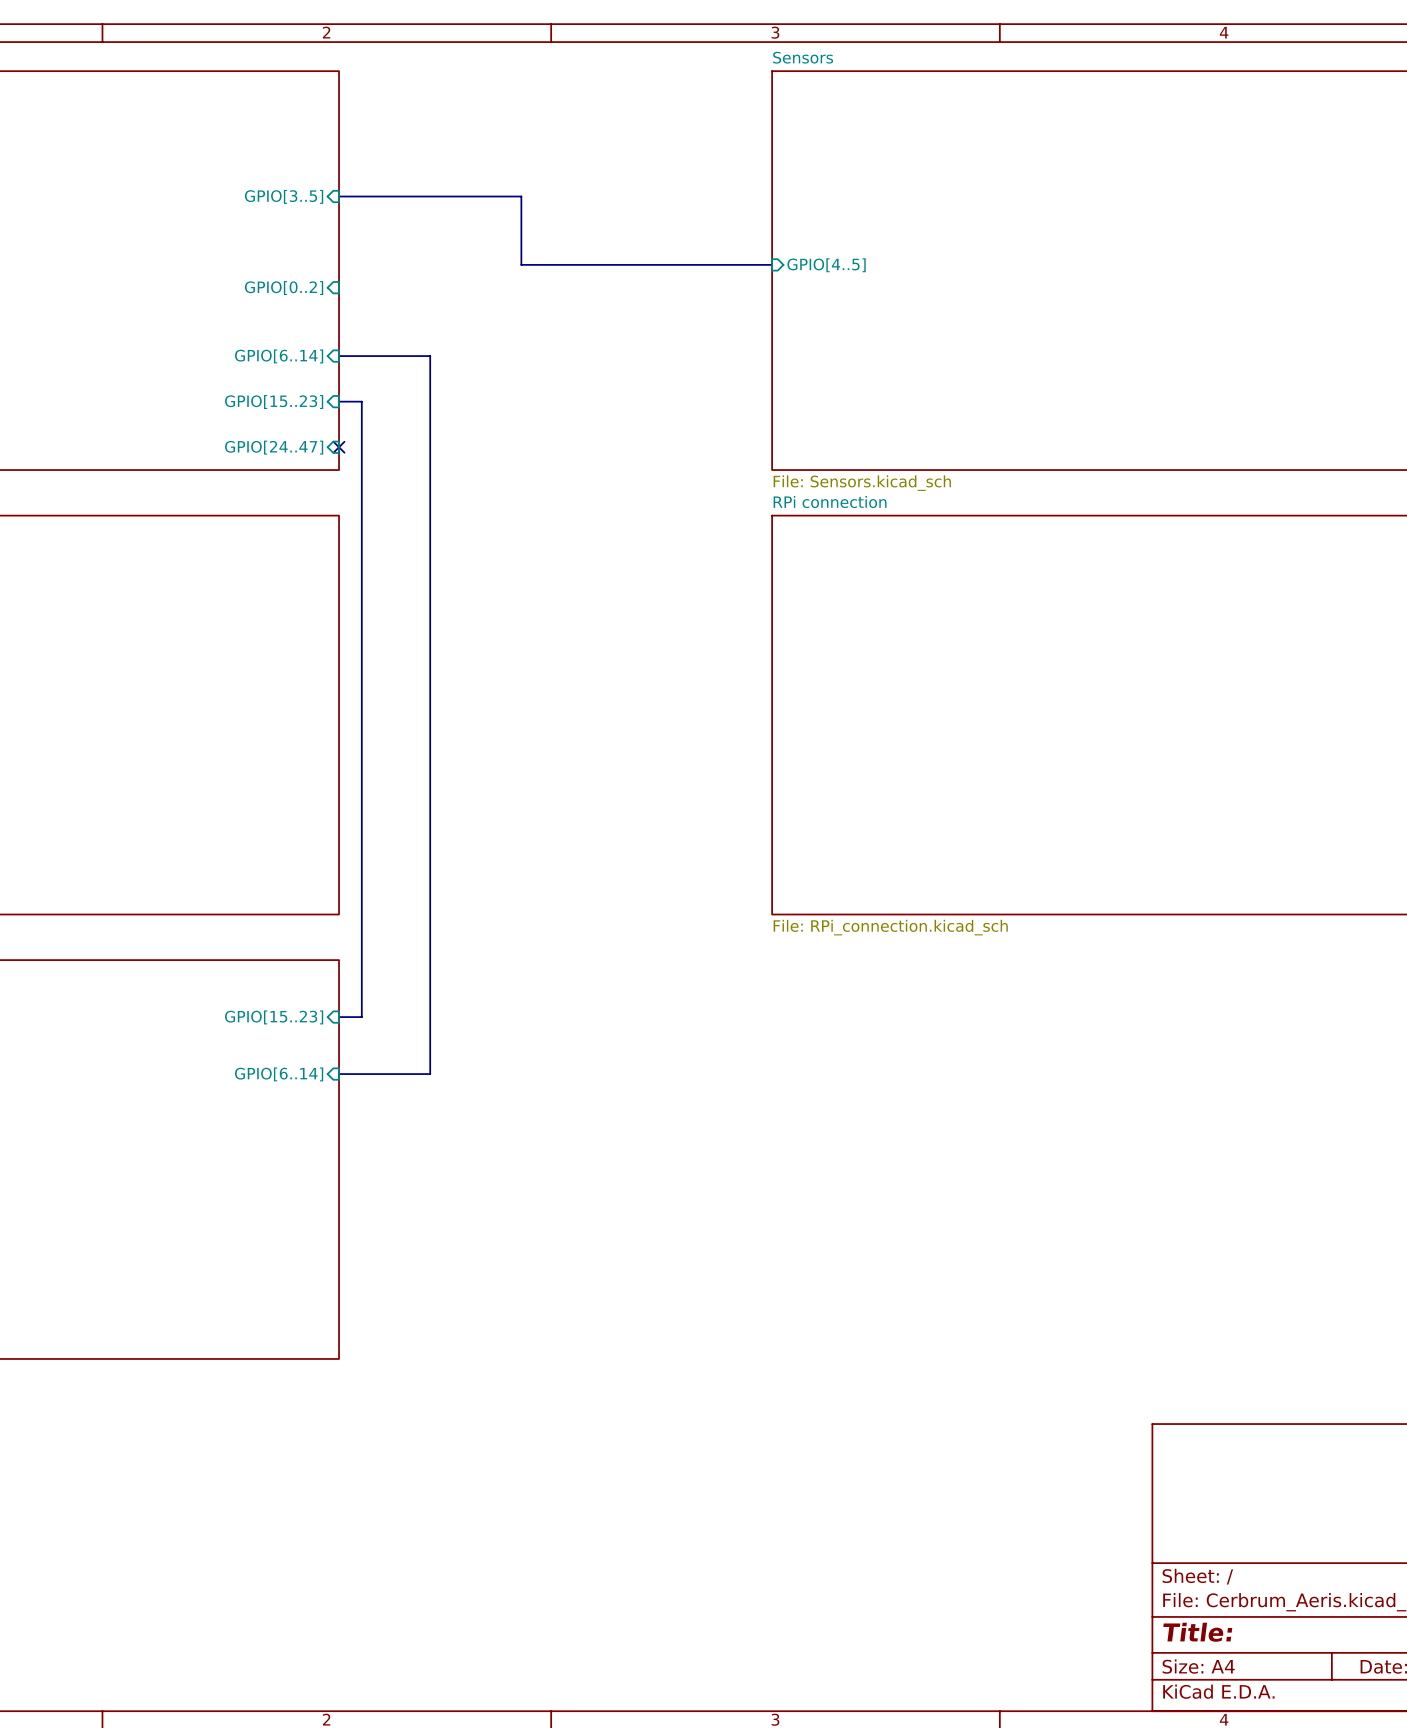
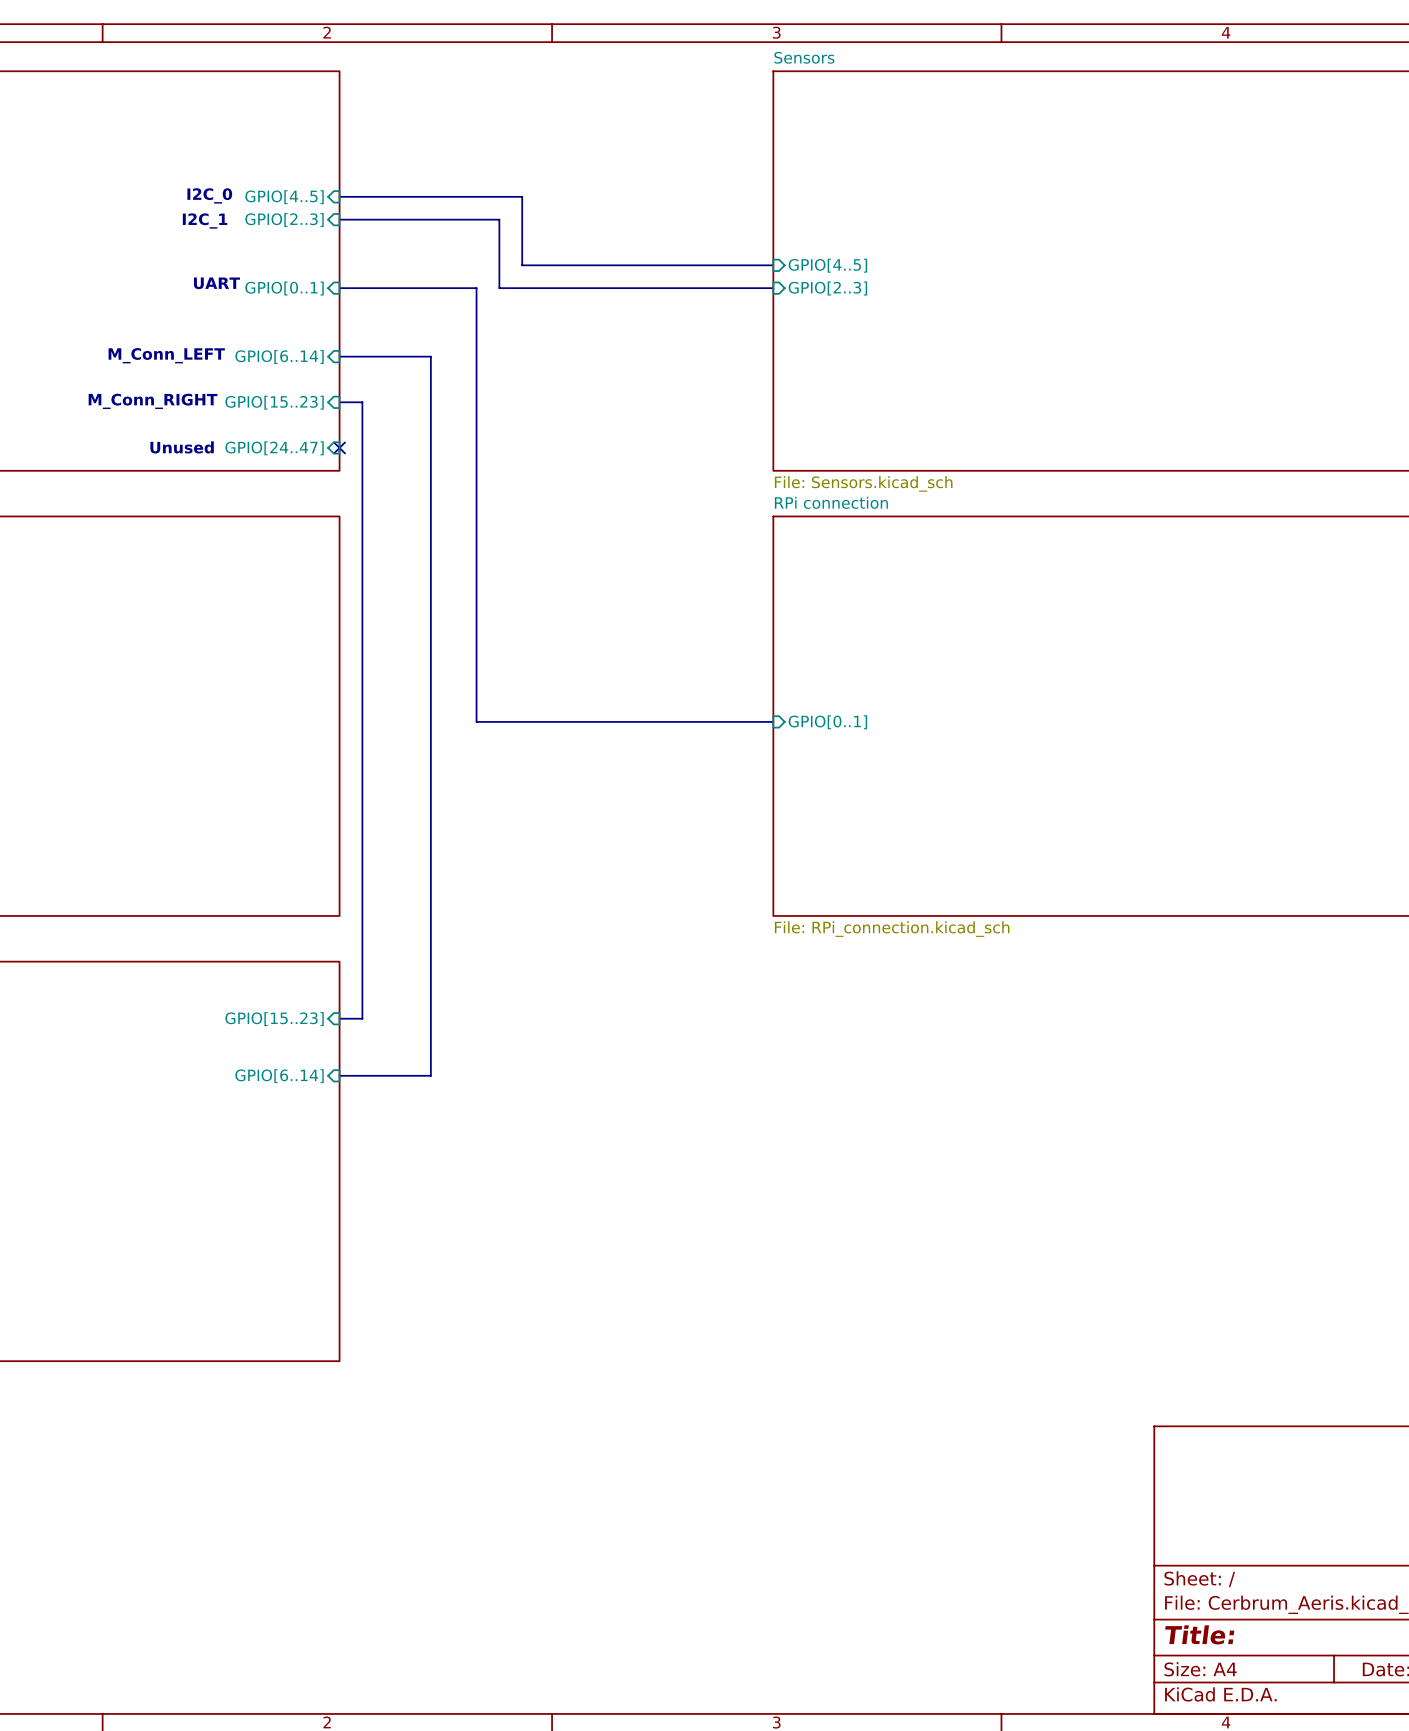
text: none -> I2C_0 (209, 195)
sheet pin: GPIO[3..5] (284, 196) -> GPIO[4..5] (284, 197)
sheet pin: none -> GPIO[2..3] (284, 220)
bus: none -> (339, 219) (499, 219) (499, 288) (773, 288)
text: none -> I2C_1 (205, 221)
text: none -> UART (216, 283)
bus: none -> (339, 288) (476, 288) (476, 721) (773, 721)
sheet pin: GPIO[0..2] (284, 288) -> GPIO[0..1] (284, 288)
sheet pin: none -> GPIO[2..3] (827, 288)
text: none -> M_Conn_LEFT (166, 355)
text: none -> M_Conn_RIGHT (153, 401)
text: none -> Unused (182, 447)
sheet pin: none -> GPIO[0..1] (827, 722)

